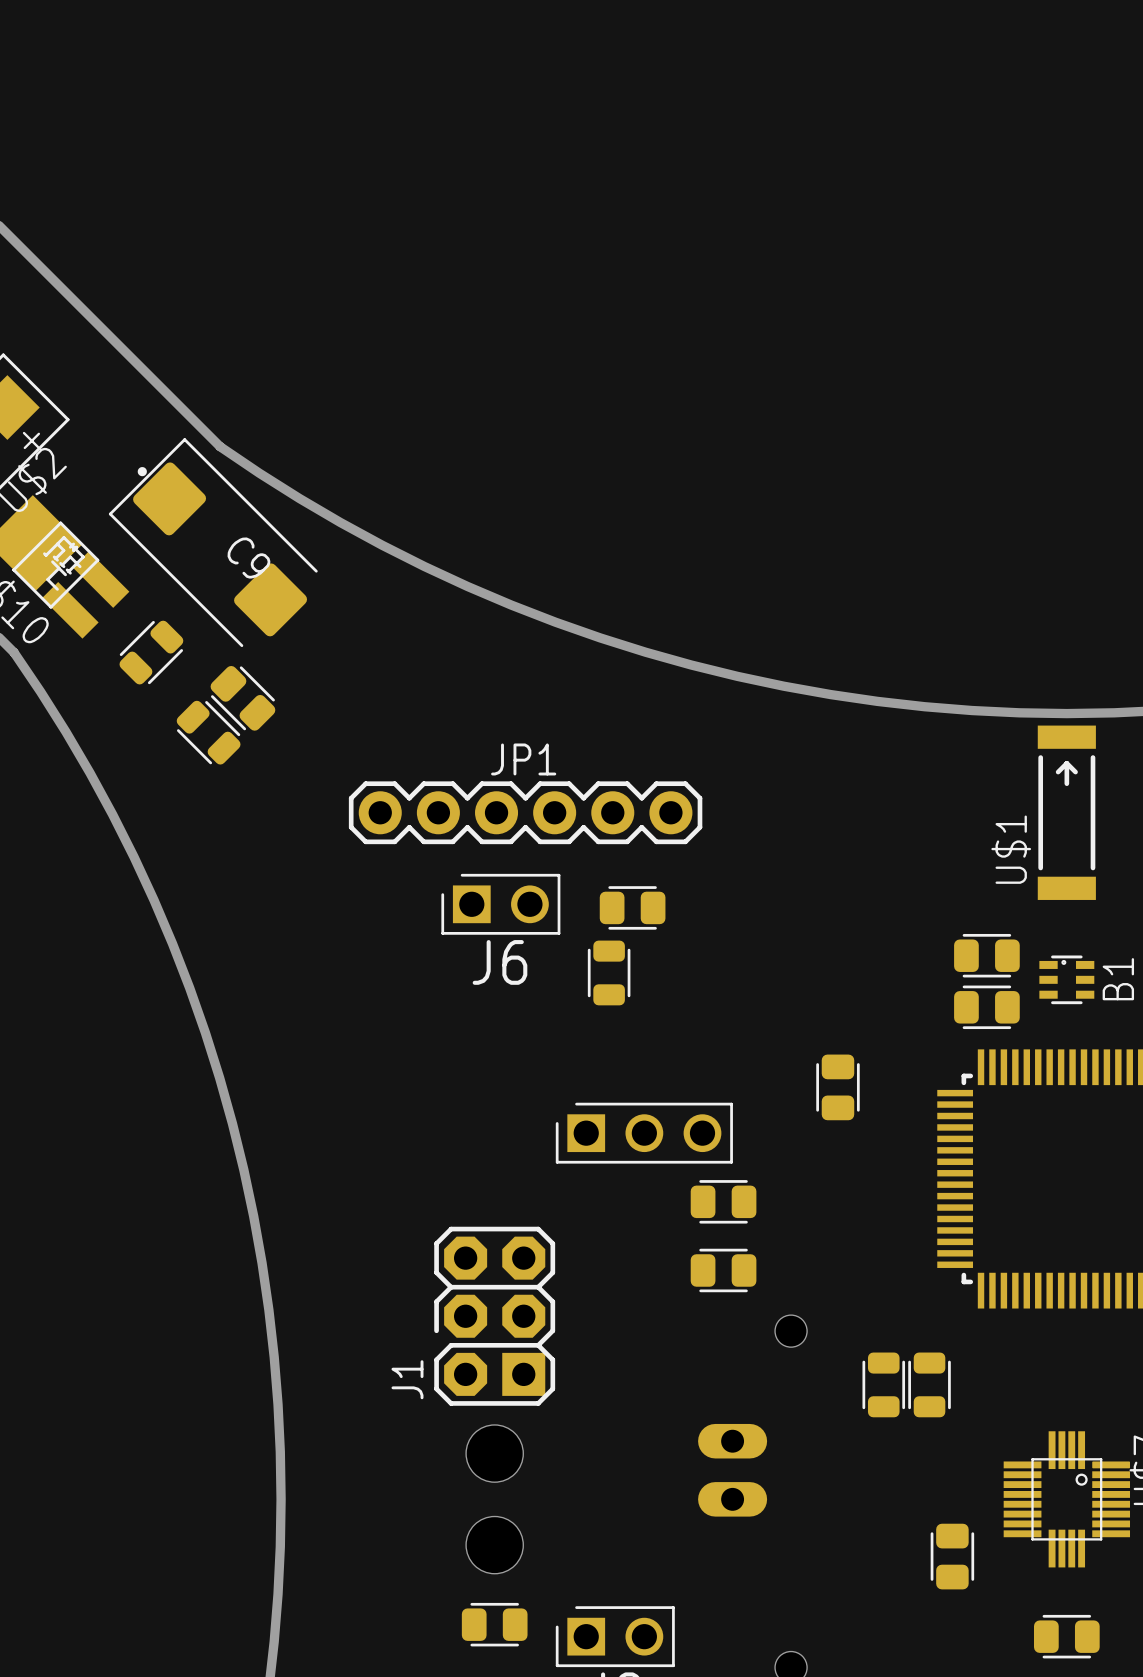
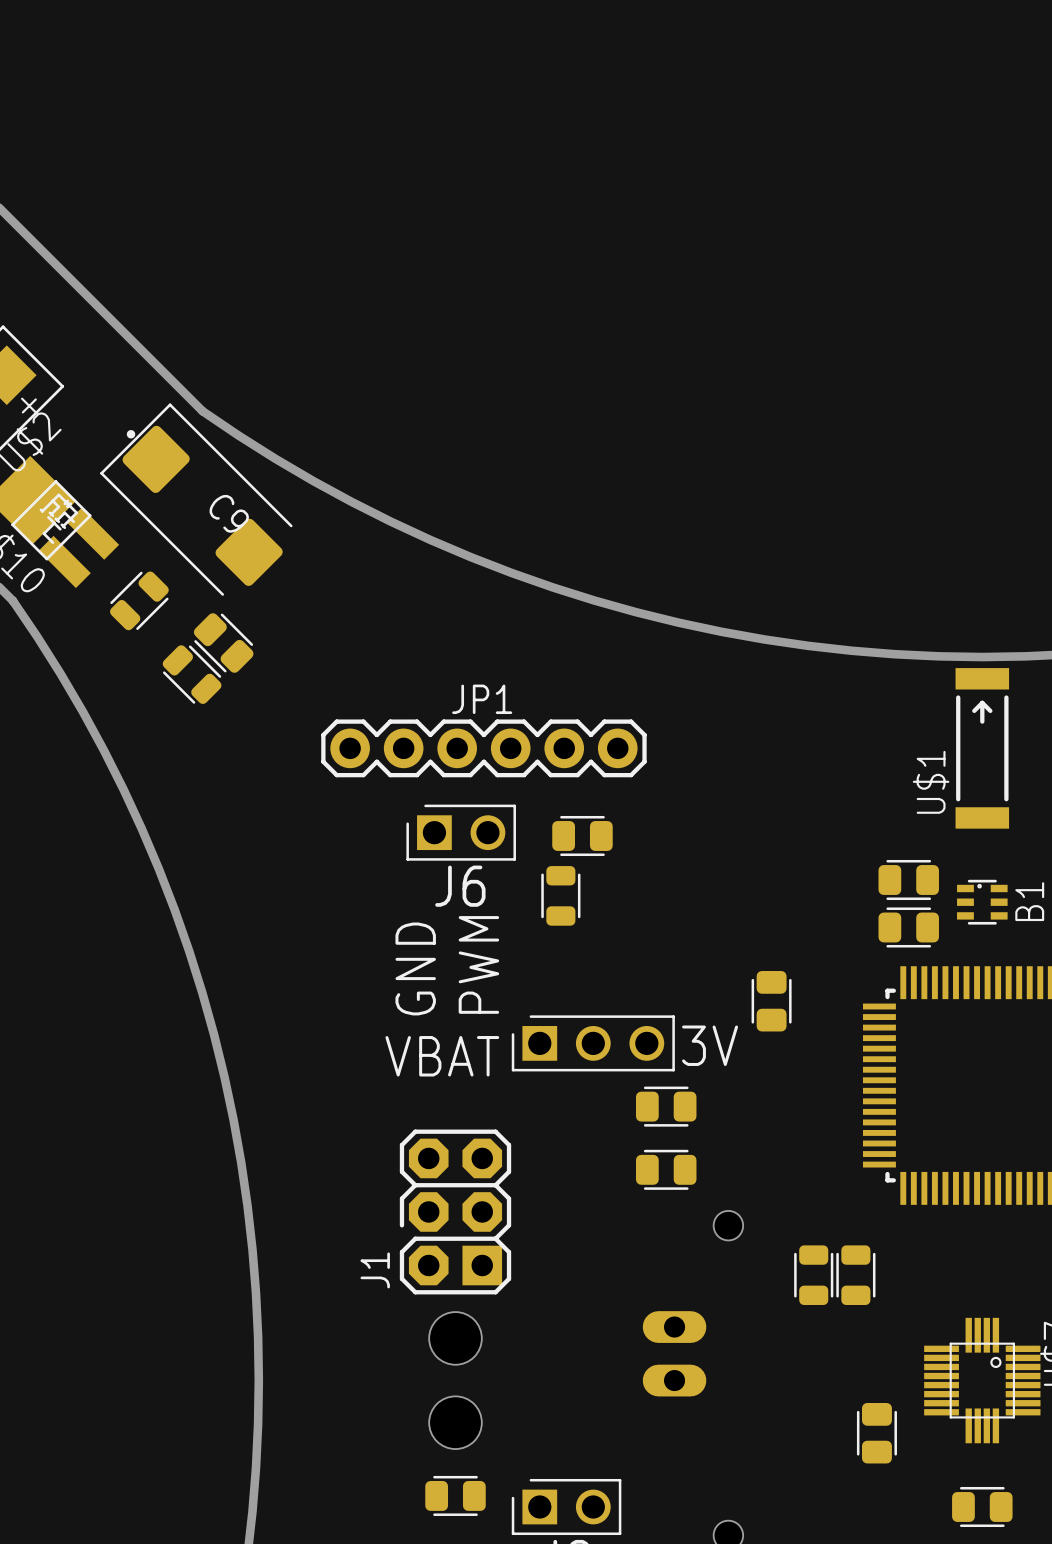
text: none -> PWM (478, 964)
text: none -> GND (415, 968)
text: none -> 3V (710, 1045)
text: none -> VBAT (442, 1056)

